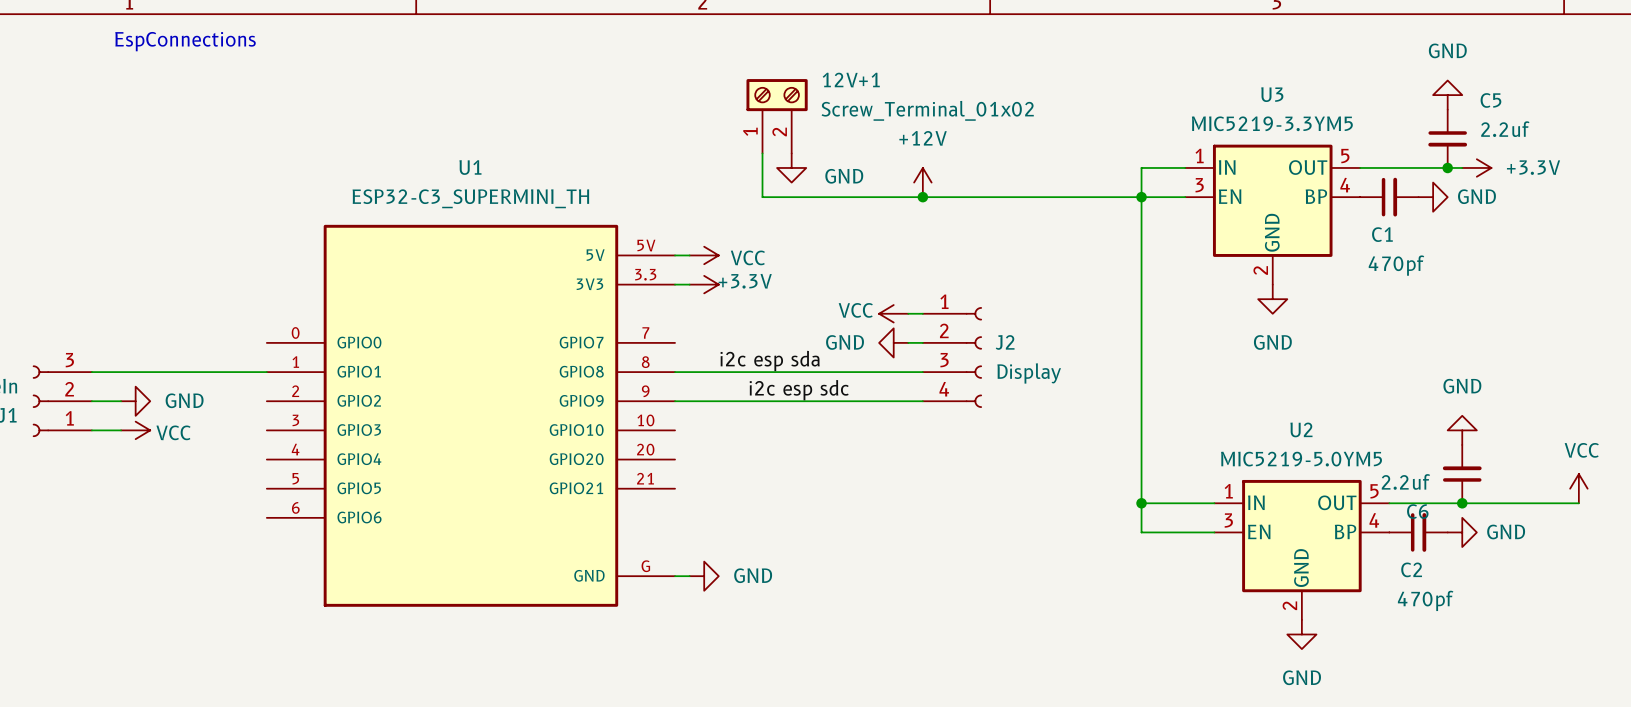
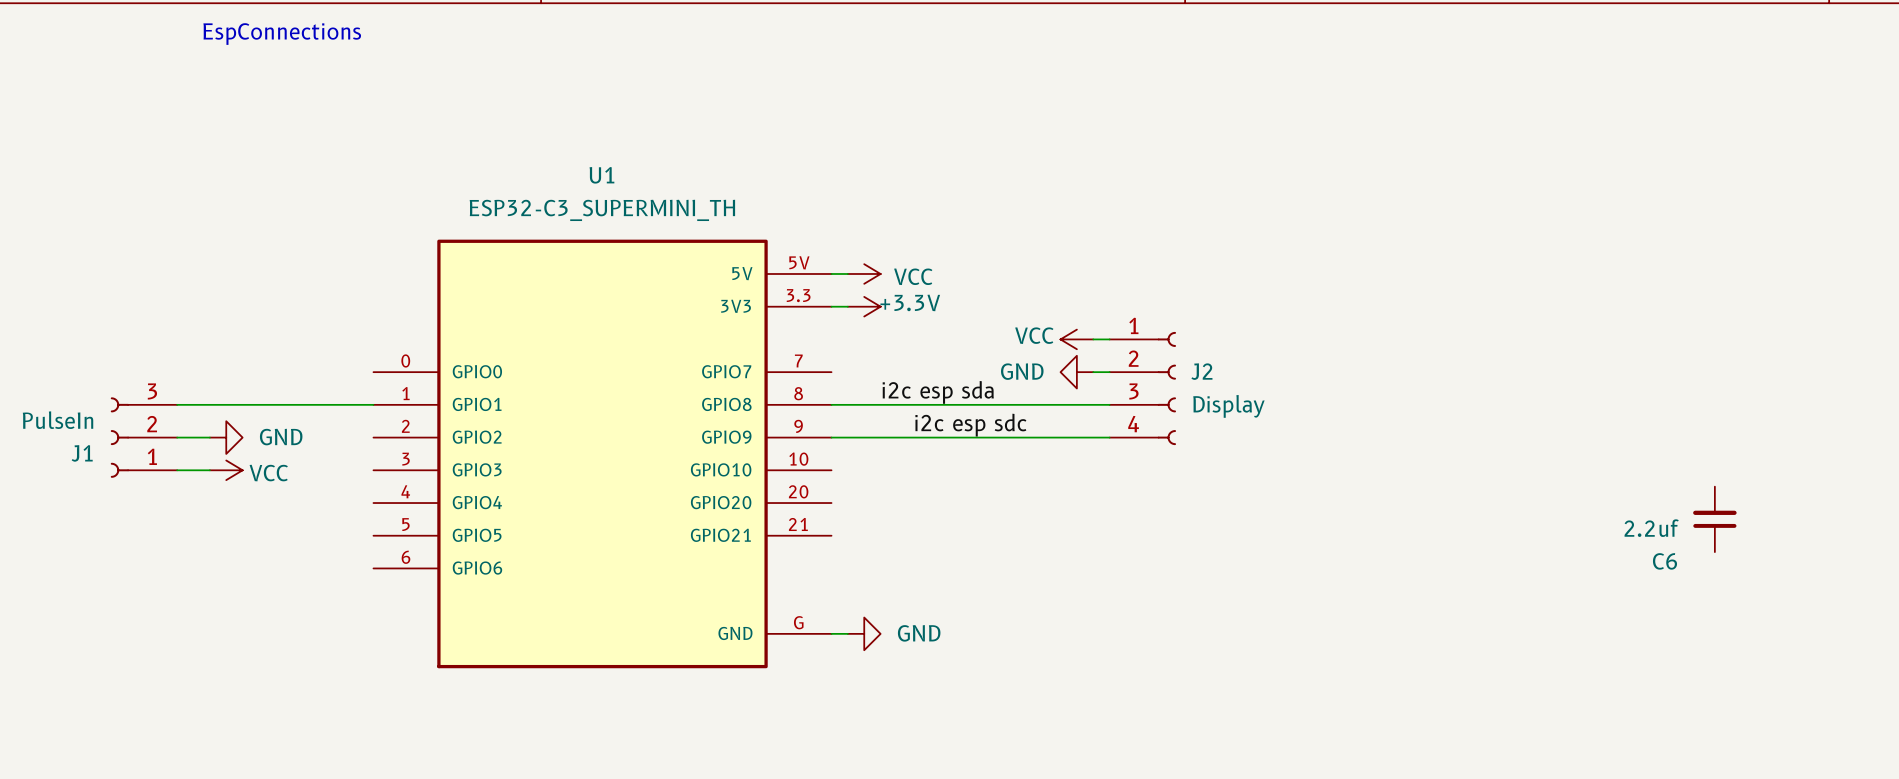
power symbol: GND (1447, 95) -> none
12V+1: Screw_Terminal_01x02 (777, 116) -> none
C5: 2.2uf (1447, 138) -> none
wire: (762, 153) (762, 197) (1185, 197) -> none
power symbol: GND (791, 167) -> none
wire: (1185, 167) (1141, 167) (1141, 532) (1214, 532) -> none
wire: (1360, 167) (1462, 167) -> none
junction: (1447, 167) -> none
power symbol: +3.3V (1476, 167) -> none
power symbol: +12V (922, 182) -> none
junction: (922, 197) -> none
junction: (1141, 197) -> none
C1: 470pf (1389, 197) -> none
power symbol: GND (1433, 197) -> none
U3: MIC5219-3.3YM5 (1272, 214) -> none
power symbol: GND (1272, 299) -> none
power symbol: GND (1462, 430) -> none
power symbol: VCC (1578, 488) -> none
wire: (1141, 503) (1214, 503) -> none
junction: (1141, 503) -> none
wire: (1389, 503) (1578, 503) -> none
junction: (1462, 503) -> none
C2: 470pf (1418, 532) -> none
power symbol: GND (1462, 532) -> none
U2: MIC5219-5.0YM5 (1301, 549) -> none
power symbol: GND (1301, 634) -> none

